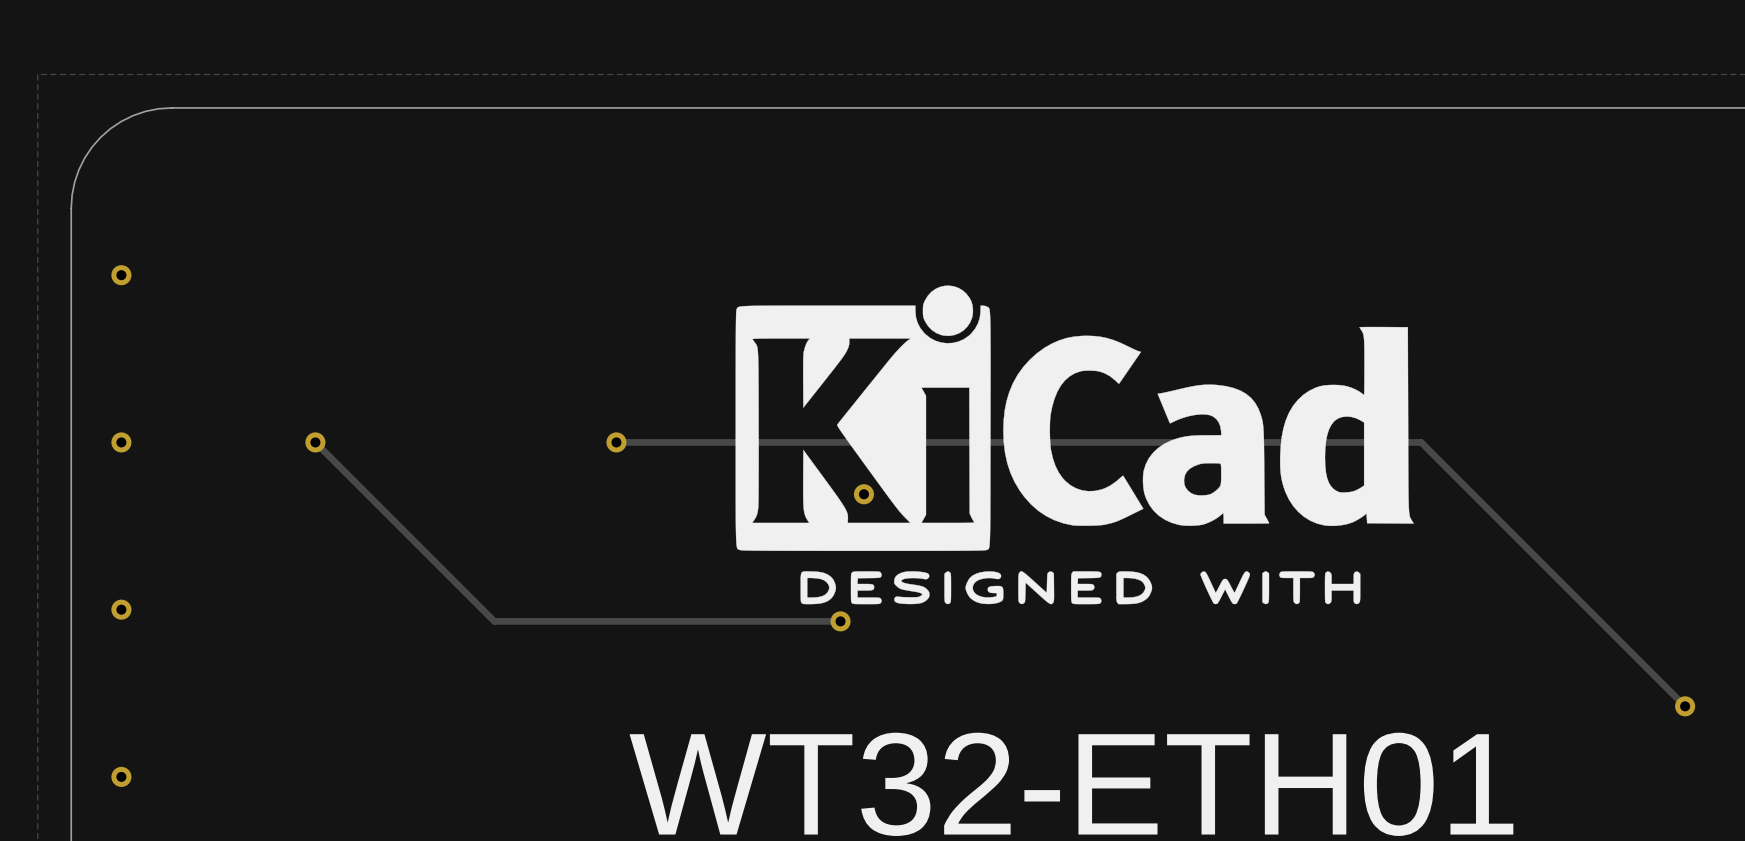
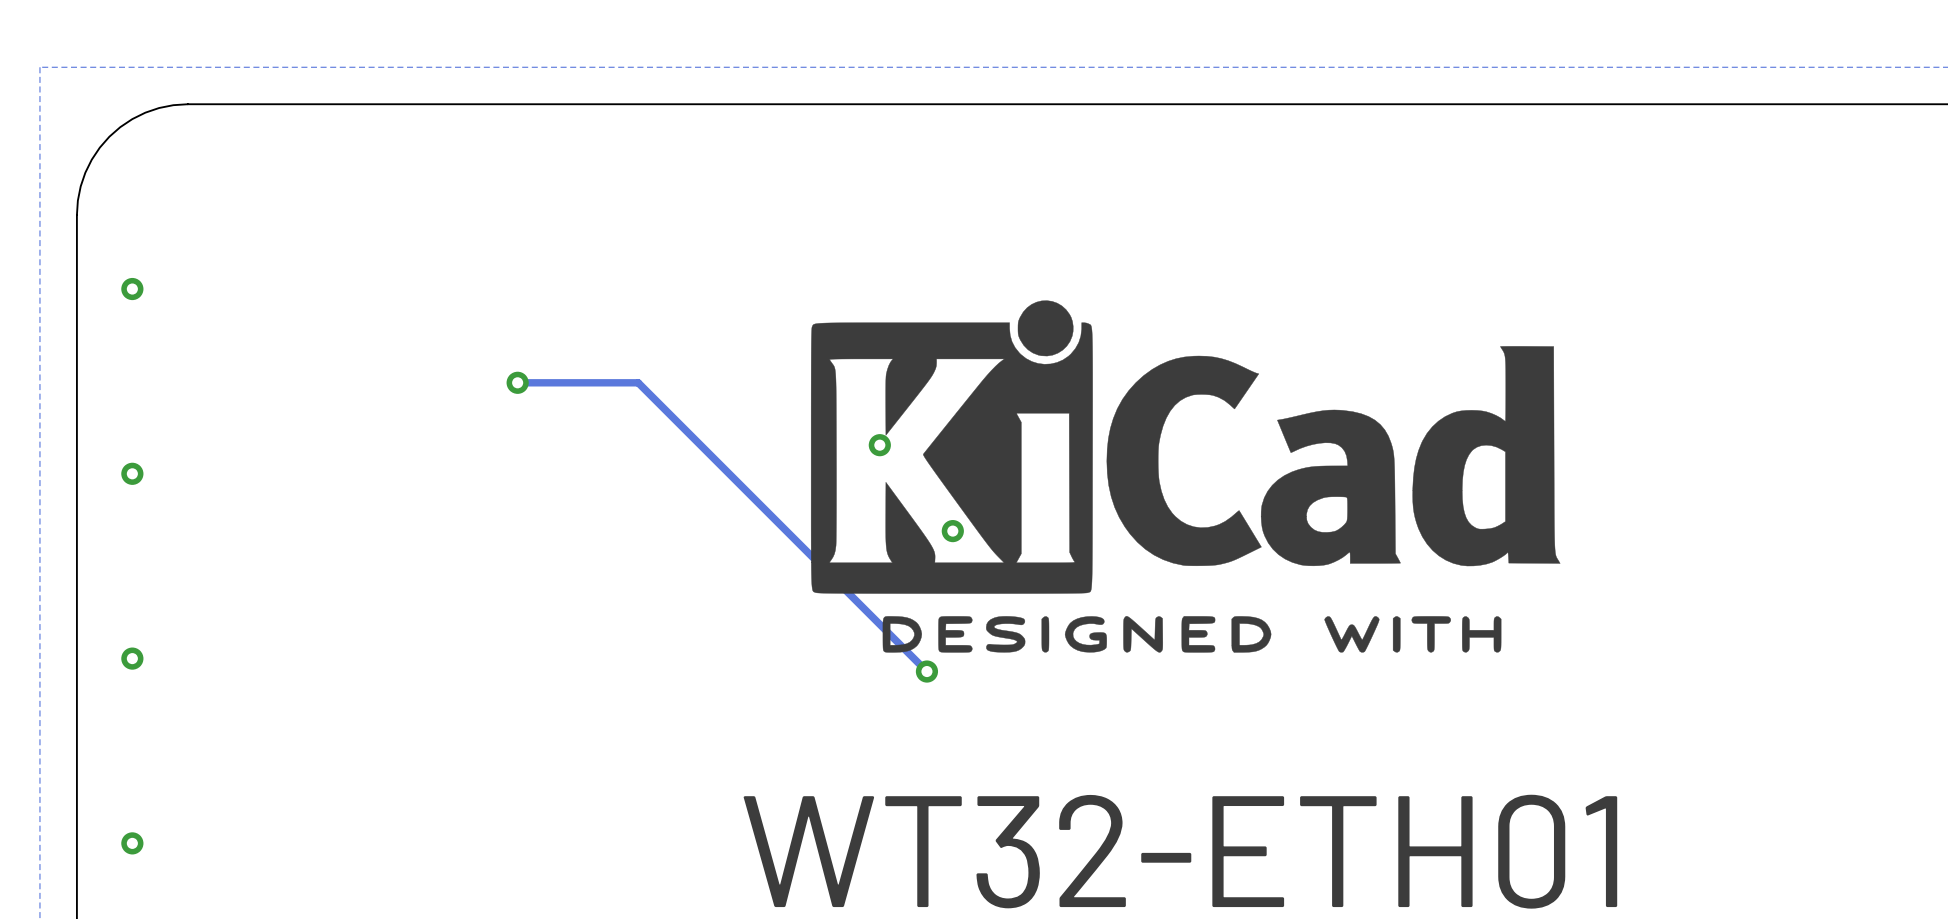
via: none -> (517, 382)
via: none -> (879, 445)
track: (315, 442) (494, 621) (840, 621) -> (517, 382) (638, 382) (926, 671)
via: (315, 442) -> none
track: (616, 442) (1421, 442) (1685, 706) -> none
via: (616, 442) -> none
via: (1685, 706) -> none

